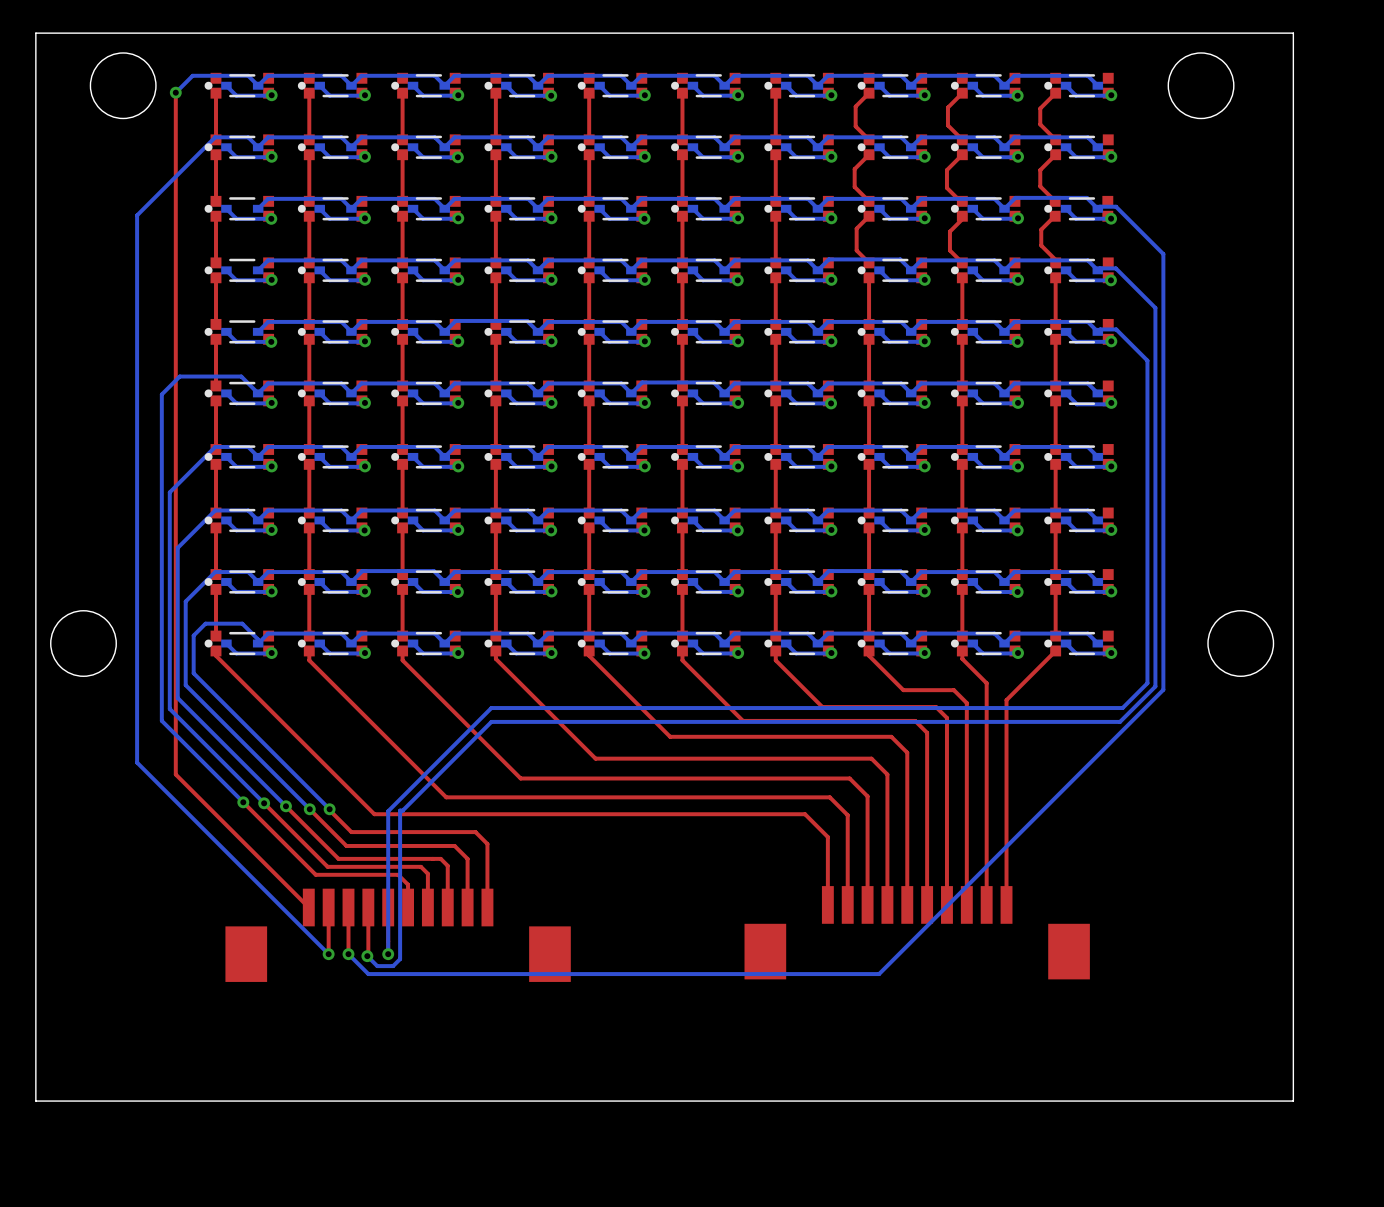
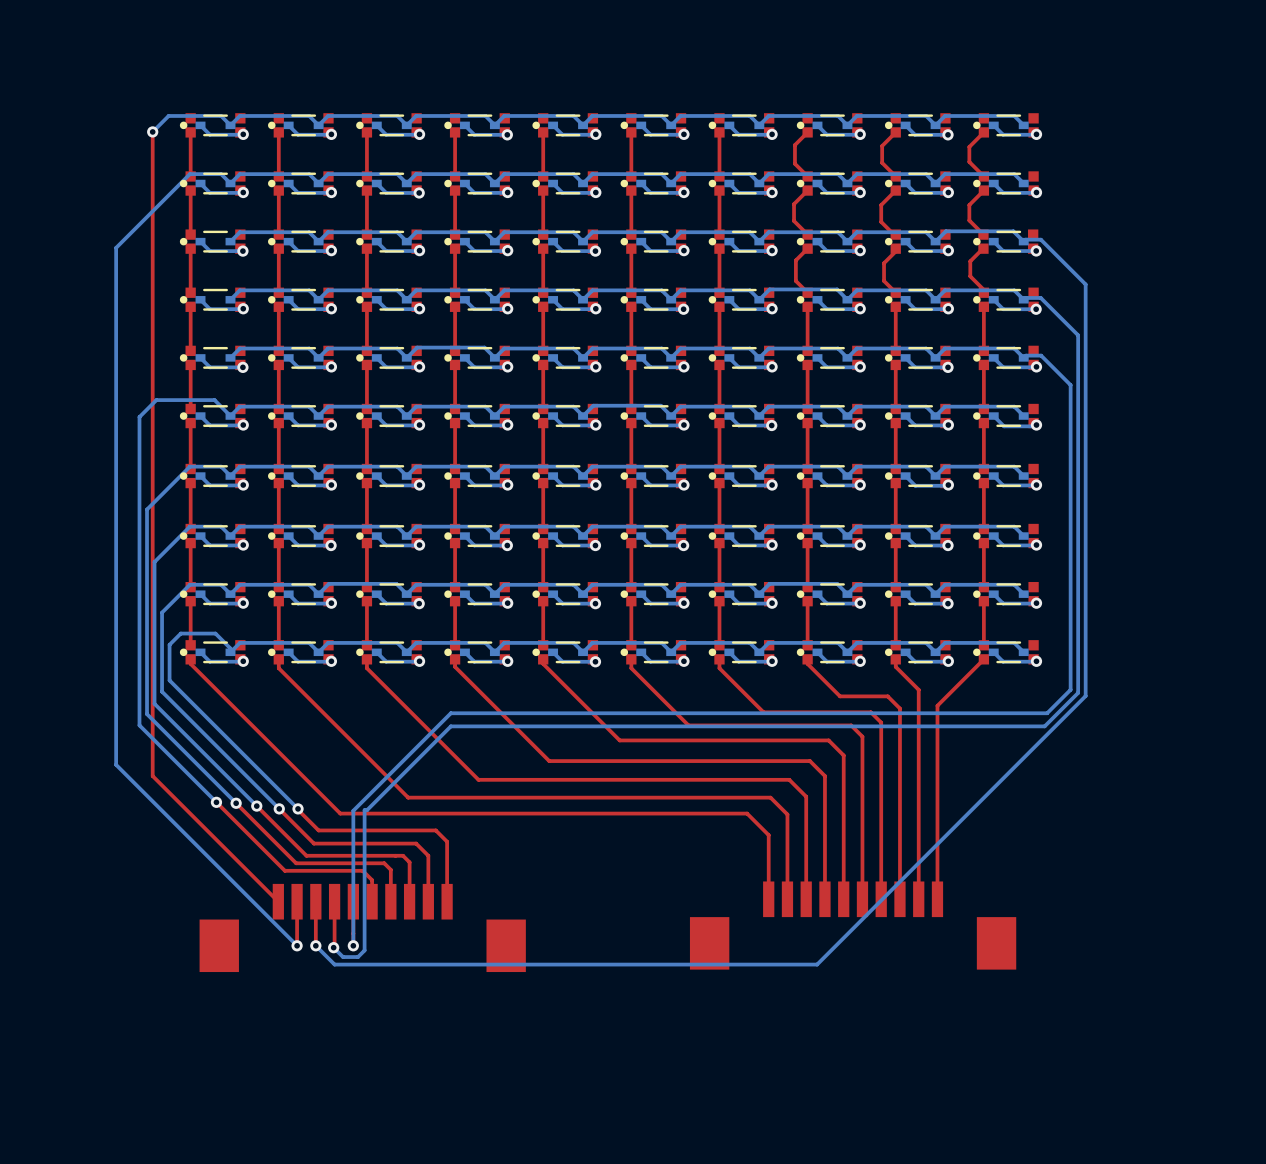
board edge: (1293, 33) (35, 33) (35, 1101) (1293, 1101) (1293, 33) -> none
round board edge: [89, 52, 157, 119] -> none
round board edge: [1167, 52, 1235, 119] -> none
round board edge: [50, 610, 117, 677] -> none
round board edge: [1207, 610, 1275, 677] -> none

